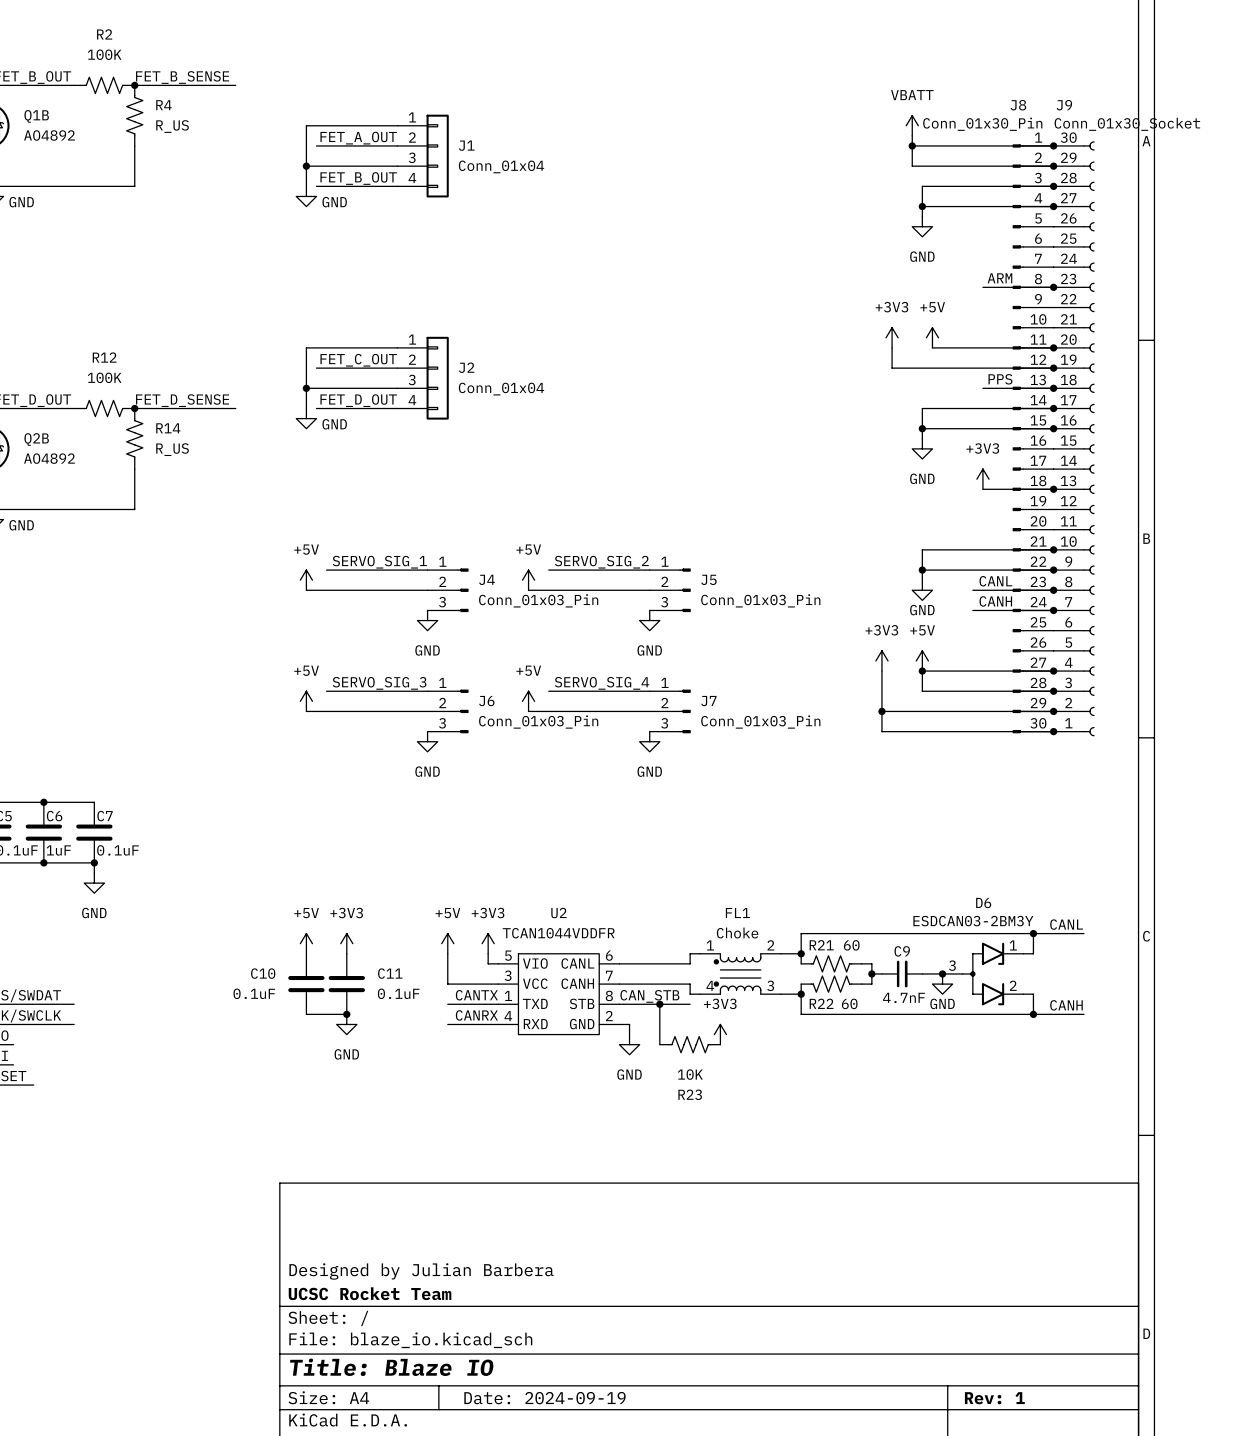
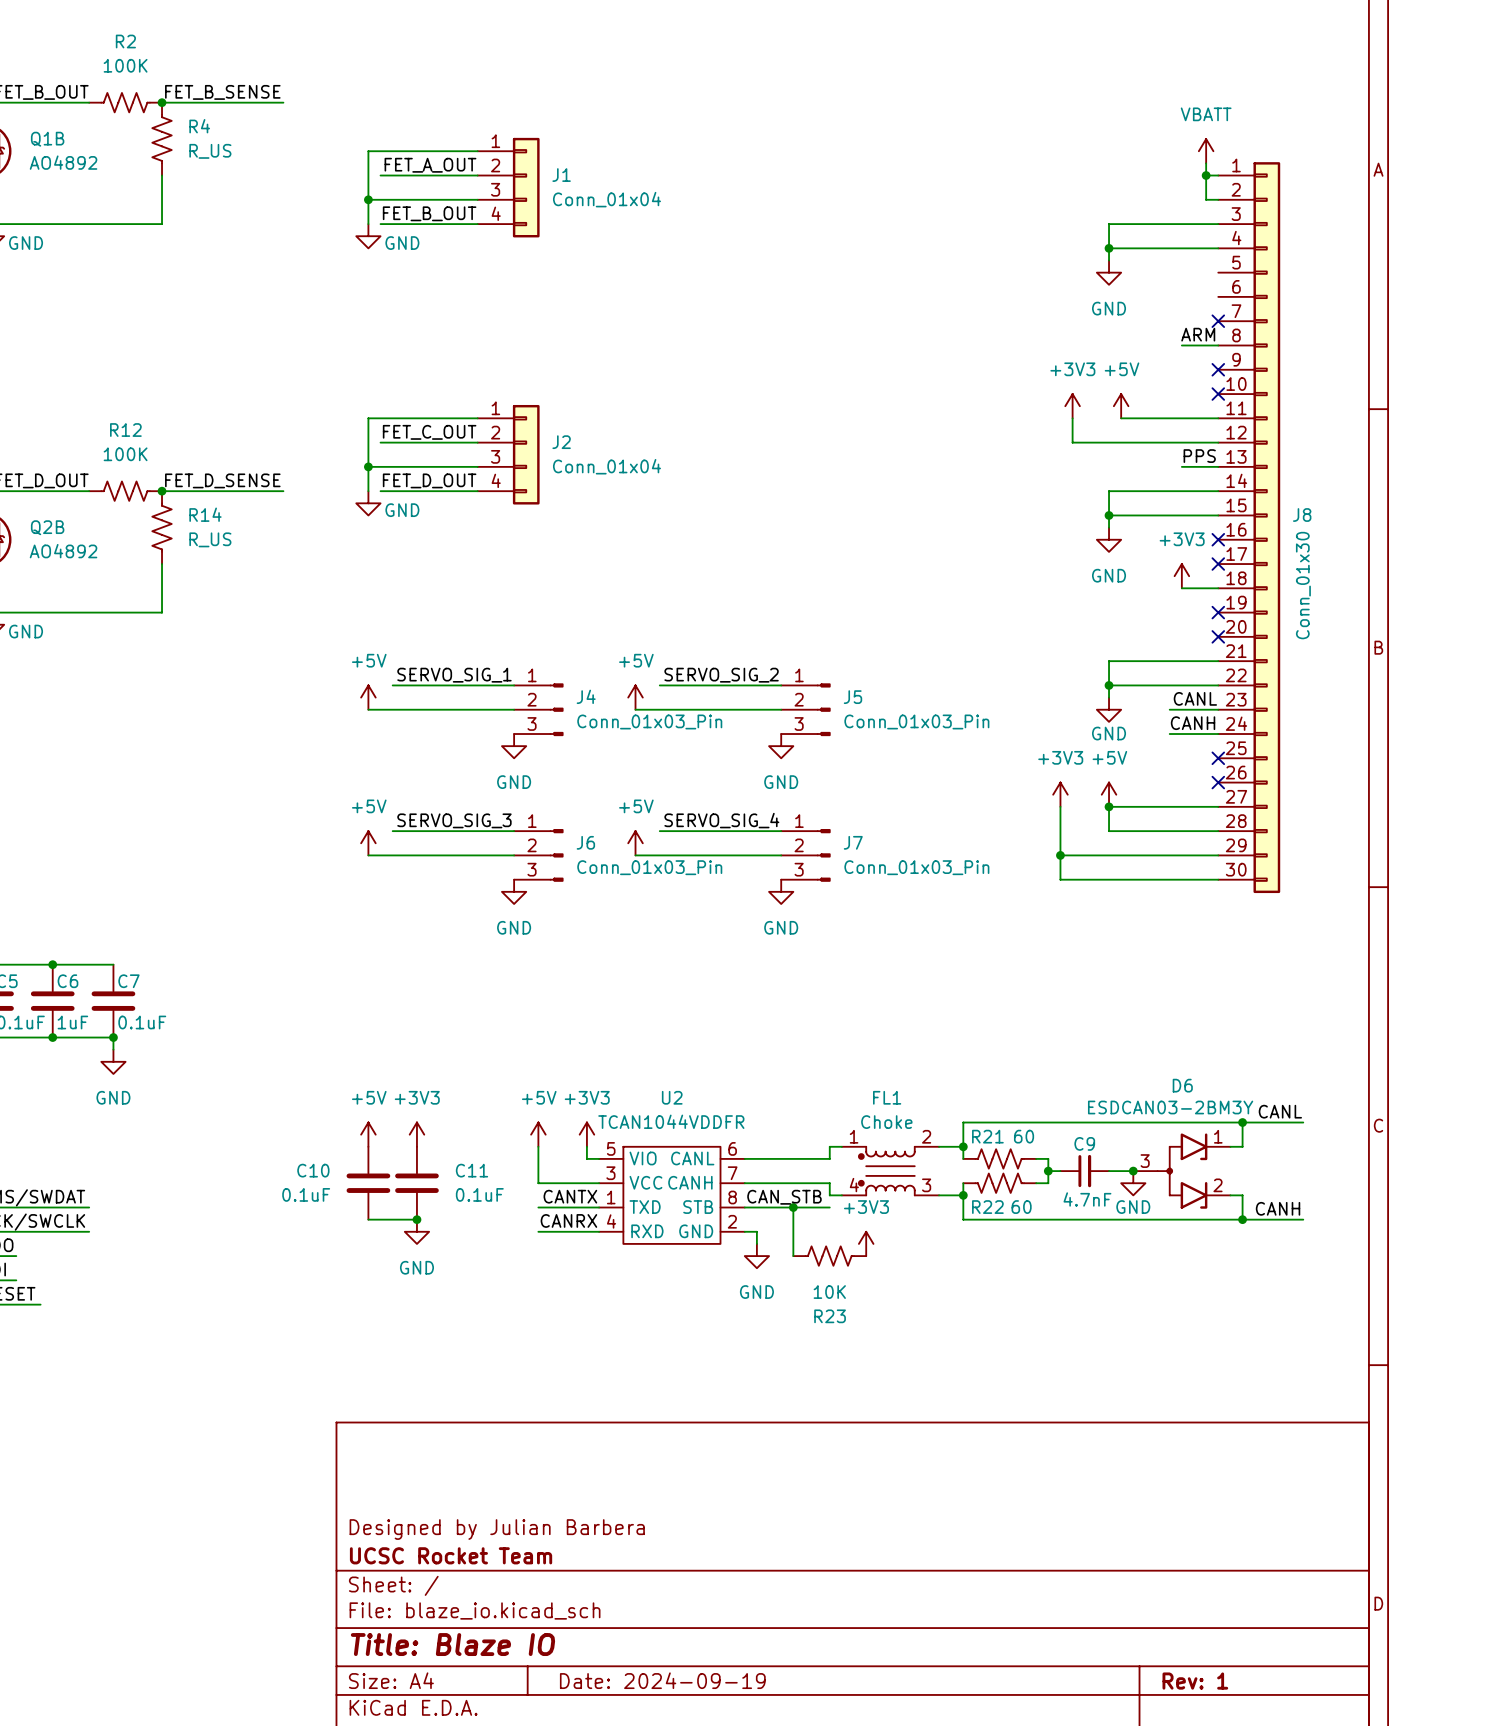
J8 name position: J8 (1018, 105) -> J8 (1302, 515)
J8 value: Conn_01x30_Pin (982, 124) -> Conn_01x30 (1303, 585)
power symbol position: VBATT (912, 125) -> VBATT (1206, 151)
wire: (912, 135) (912, 166) (1003, 166) -> (1206, 163) (1206, 199)
J8 symbol: [1012, 144, 1054, 734] -> [1218, 162, 1281, 894]
wire: (912, 145) (1003, 145) -> none
junction: (912, 145) -> none
junction: none -> (1206, 175)
junction: (1053, 145) -> none
junction: (1053, 166) -> none
junction: (1053, 186) -> none
junction: (1053, 206) -> none
no-connect mark: none -> (1218, 321)
junction: (1053, 287) -> none
no-connect mark: none -> (1218, 369)
no-connect mark: none -> (1218, 394)
junction: (1053, 347) -> none
junction: (1053, 368) -> none
junction: (1053, 388) -> none
junction: (1053, 408) -> none
junction: (1053, 428) -> none
J9: Conn_01x30_Socket (1074, 438) -> none
no-connect mark: none -> (1218, 539)
no-connect mark: none -> (1218, 564)
junction: (1053, 489) -> none
no-connect mark: none -> (1218, 612)
no-connect mark: none -> (1218, 636)
junction: (1053, 549) -> none
junction: (1053, 570) -> none
junction: (1053, 590) -> none
junction: (1053, 610) -> none
no-connect mark: none -> (1218, 758)
no-connect mark: none -> (1218, 782)
junction: (1053, 671) -> none
junction: (1053, 691) -> none
junction: (1053, 711) -> none
junction: (1053, 731) -> none

